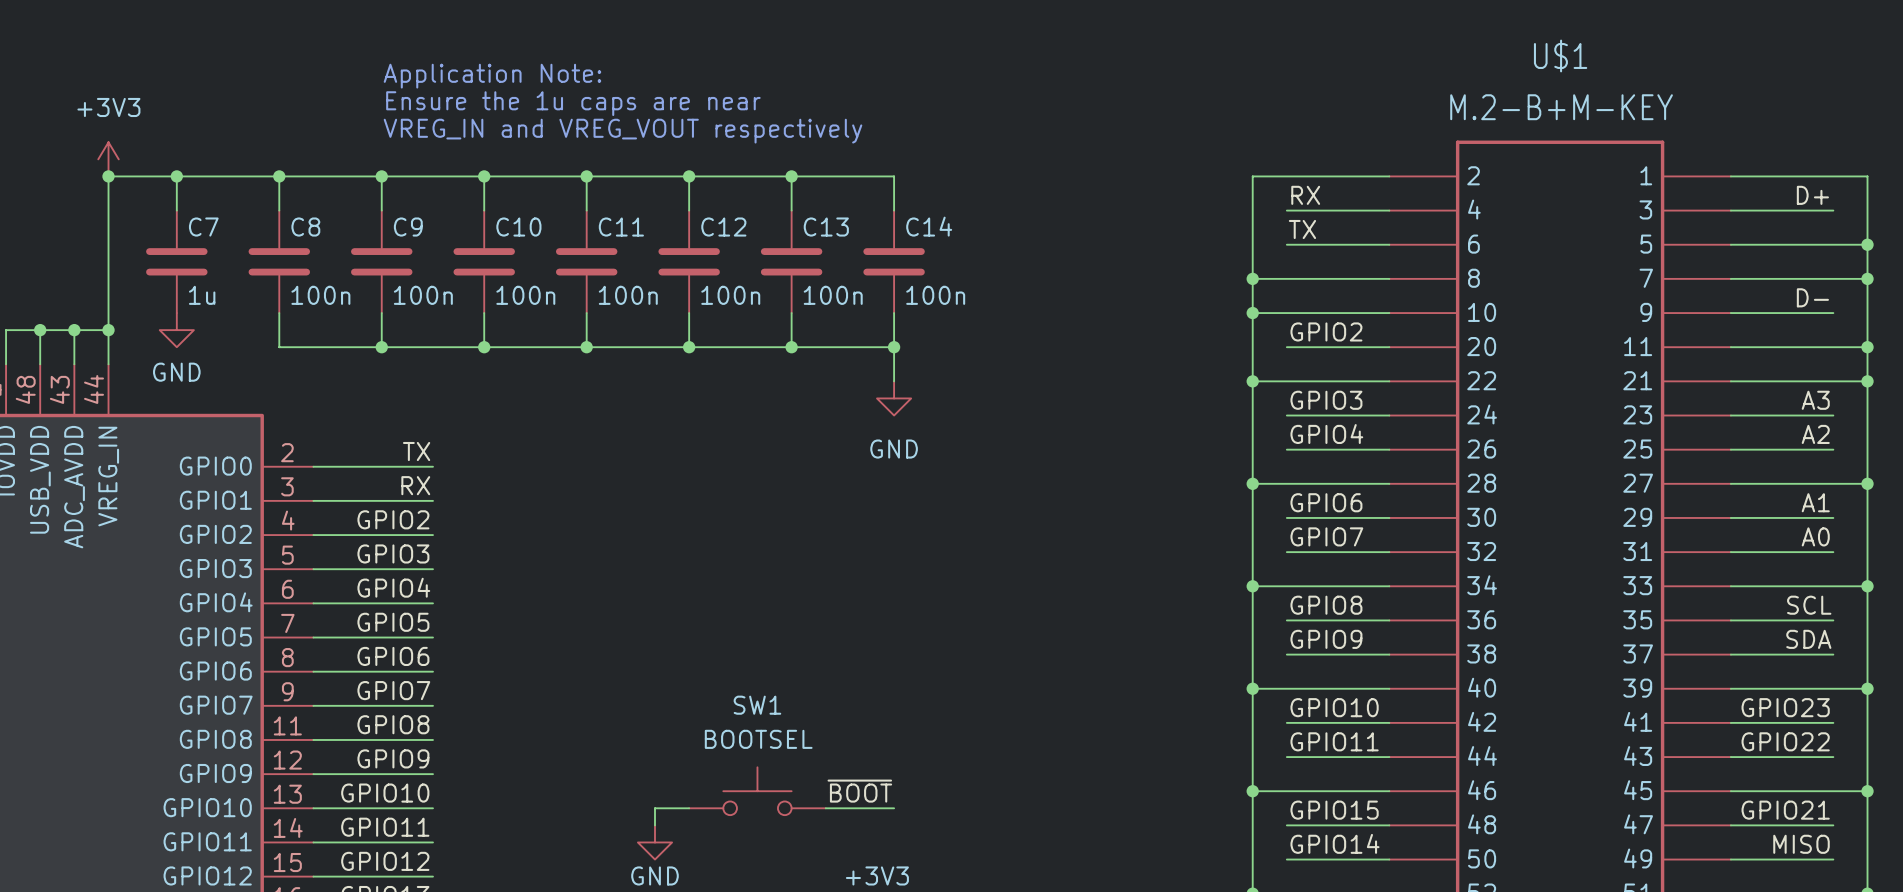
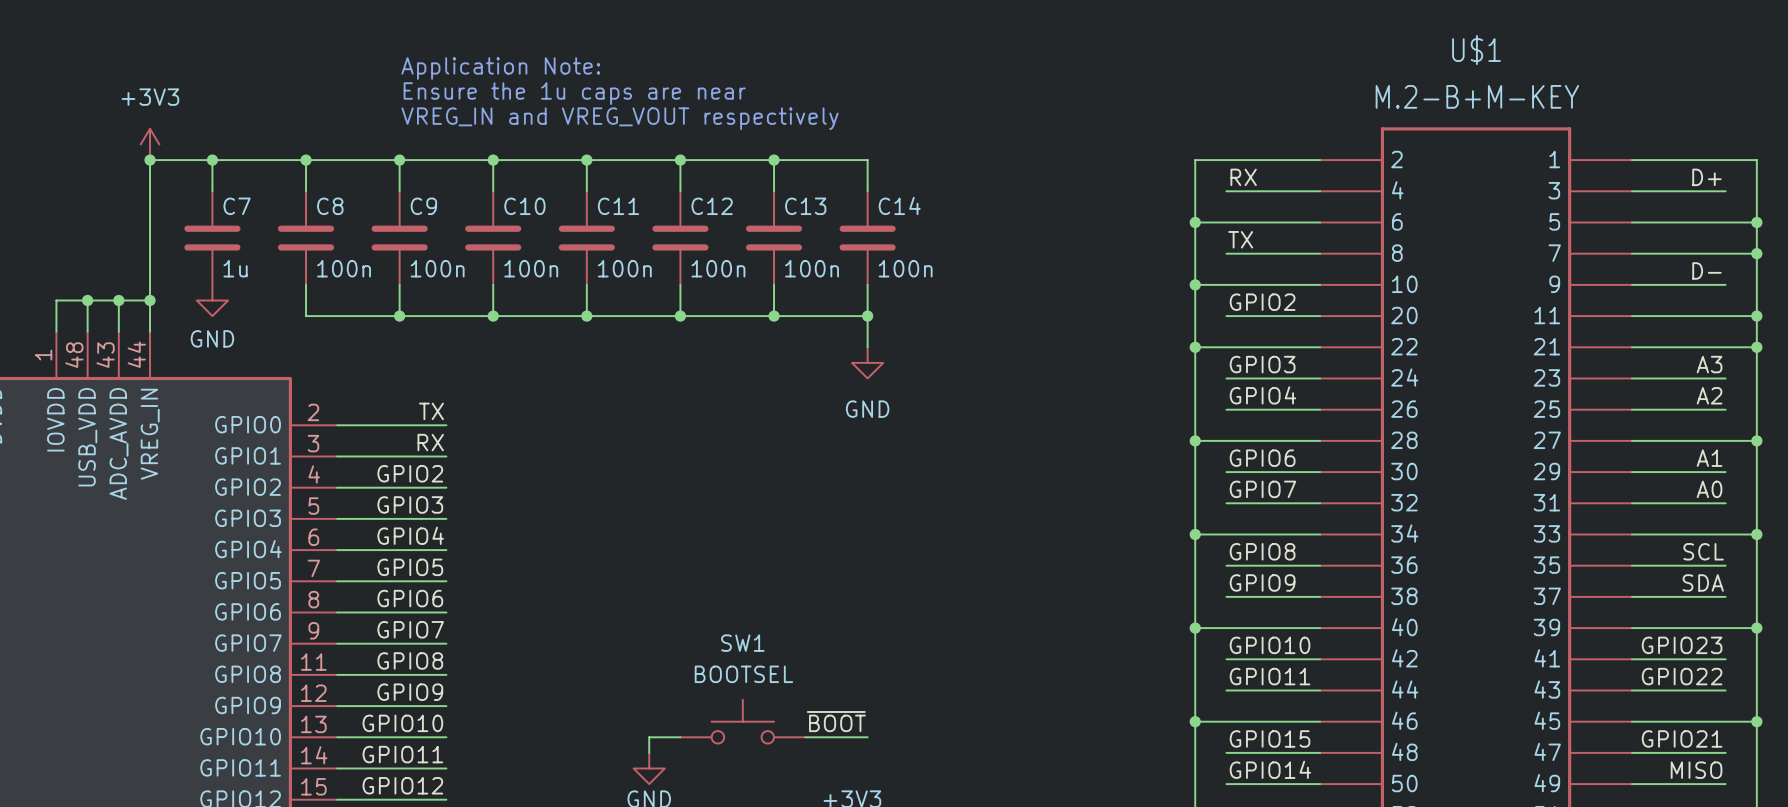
label position: TX (1302, 229) -> TX (1240, 239)
wire: (1252, 278) (1286, 278) -> (1195, 222) (1226, 222)
junction position: (1252, 278) -> (1195, 222)

